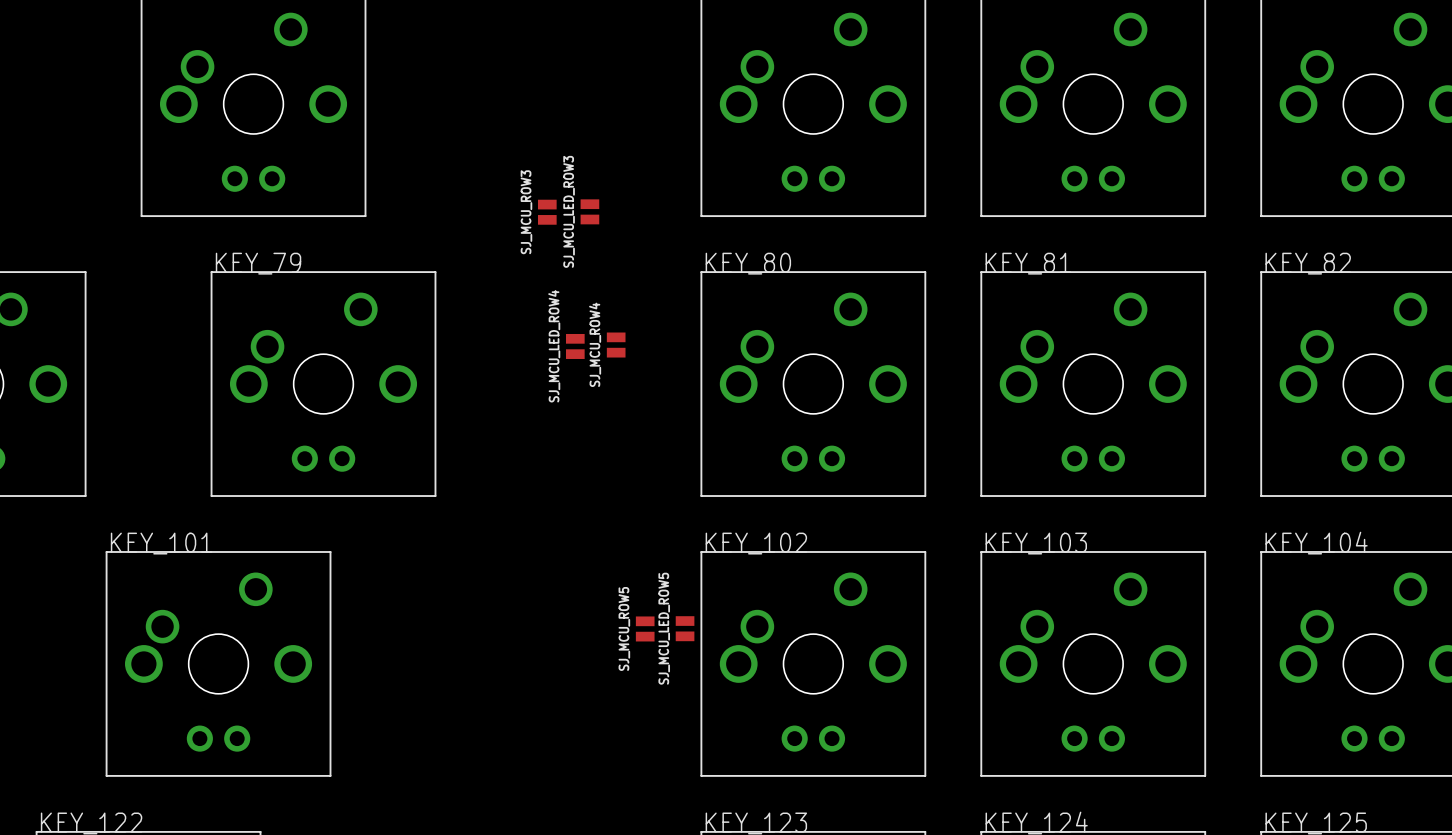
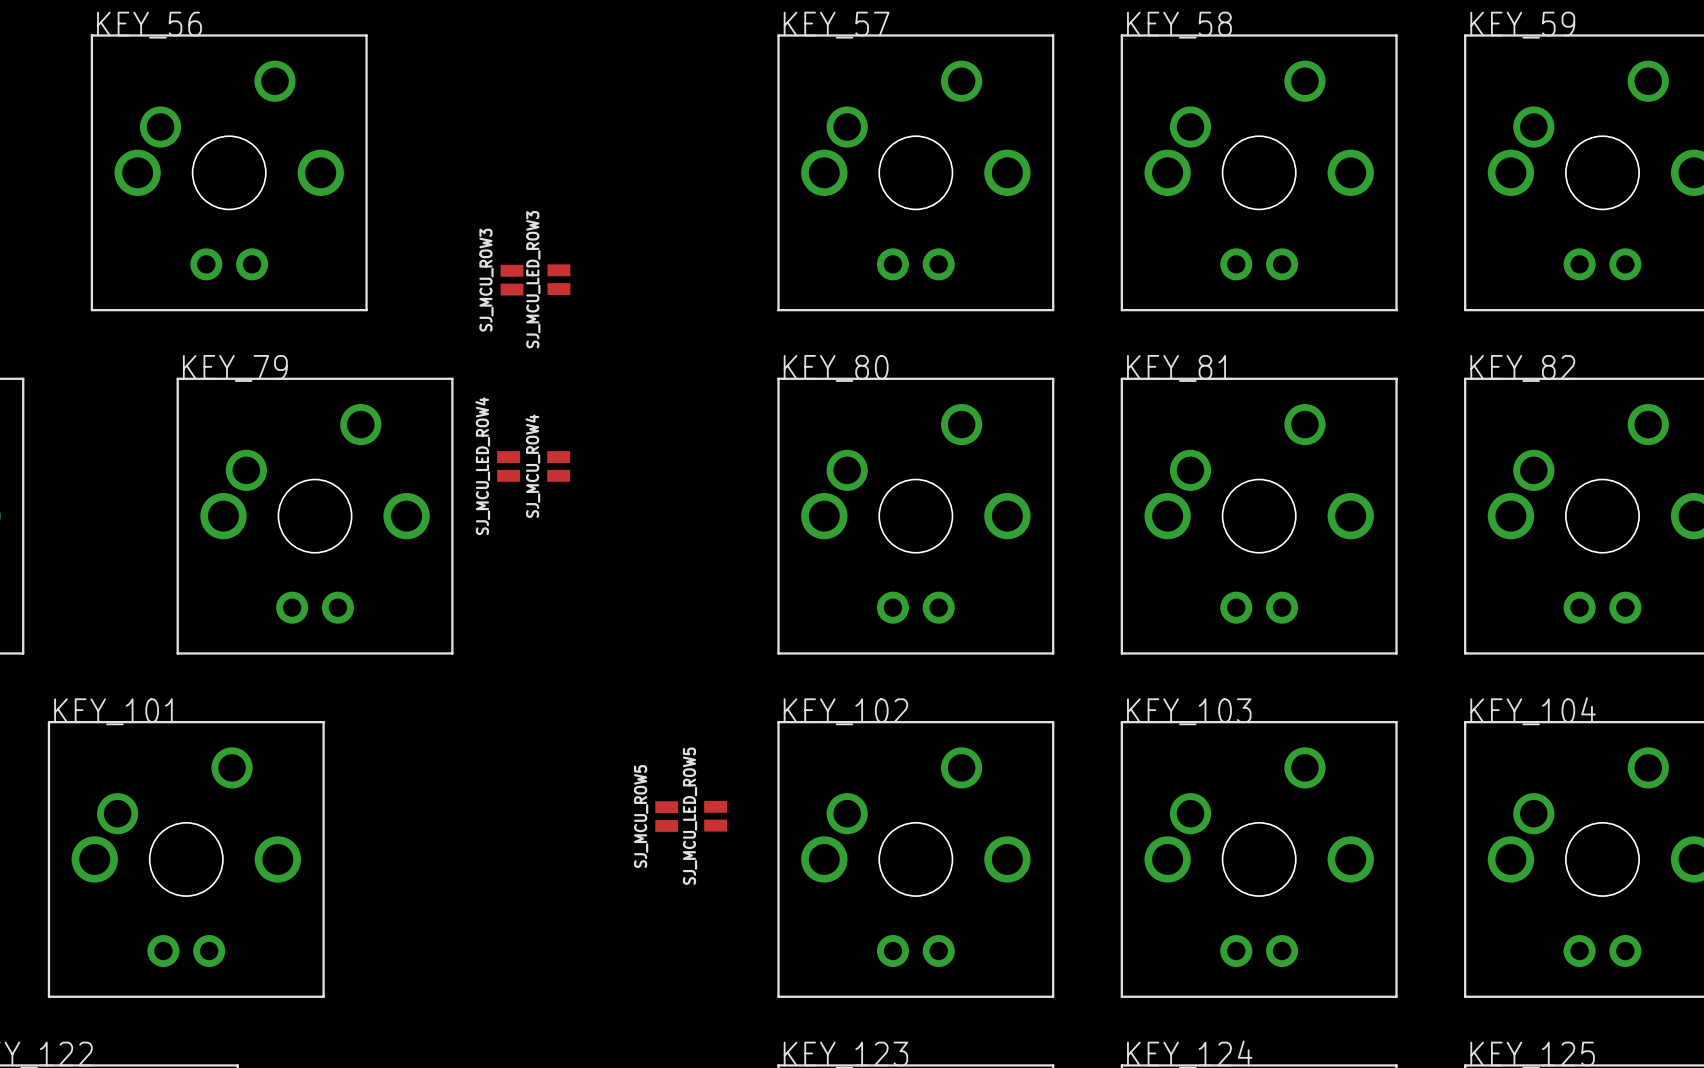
SJ_MCU_LED_ROW3 position: (589, 211) -> (558, 279)
SJ_MCU_ROW3 position: (547, 212) -> (512, 280)
SJ_MCU_ROW4 position: (616, 345) -> (558, 466)
SJ_MCU_LED_ROW4 position: (575, 346) -> (508, 466)
SJ_MCU_ROW5 position: (645, 628) -> (666, 816)
SJ_MCU_LED_ROW5 position: (685, 628) -> (715, 816)

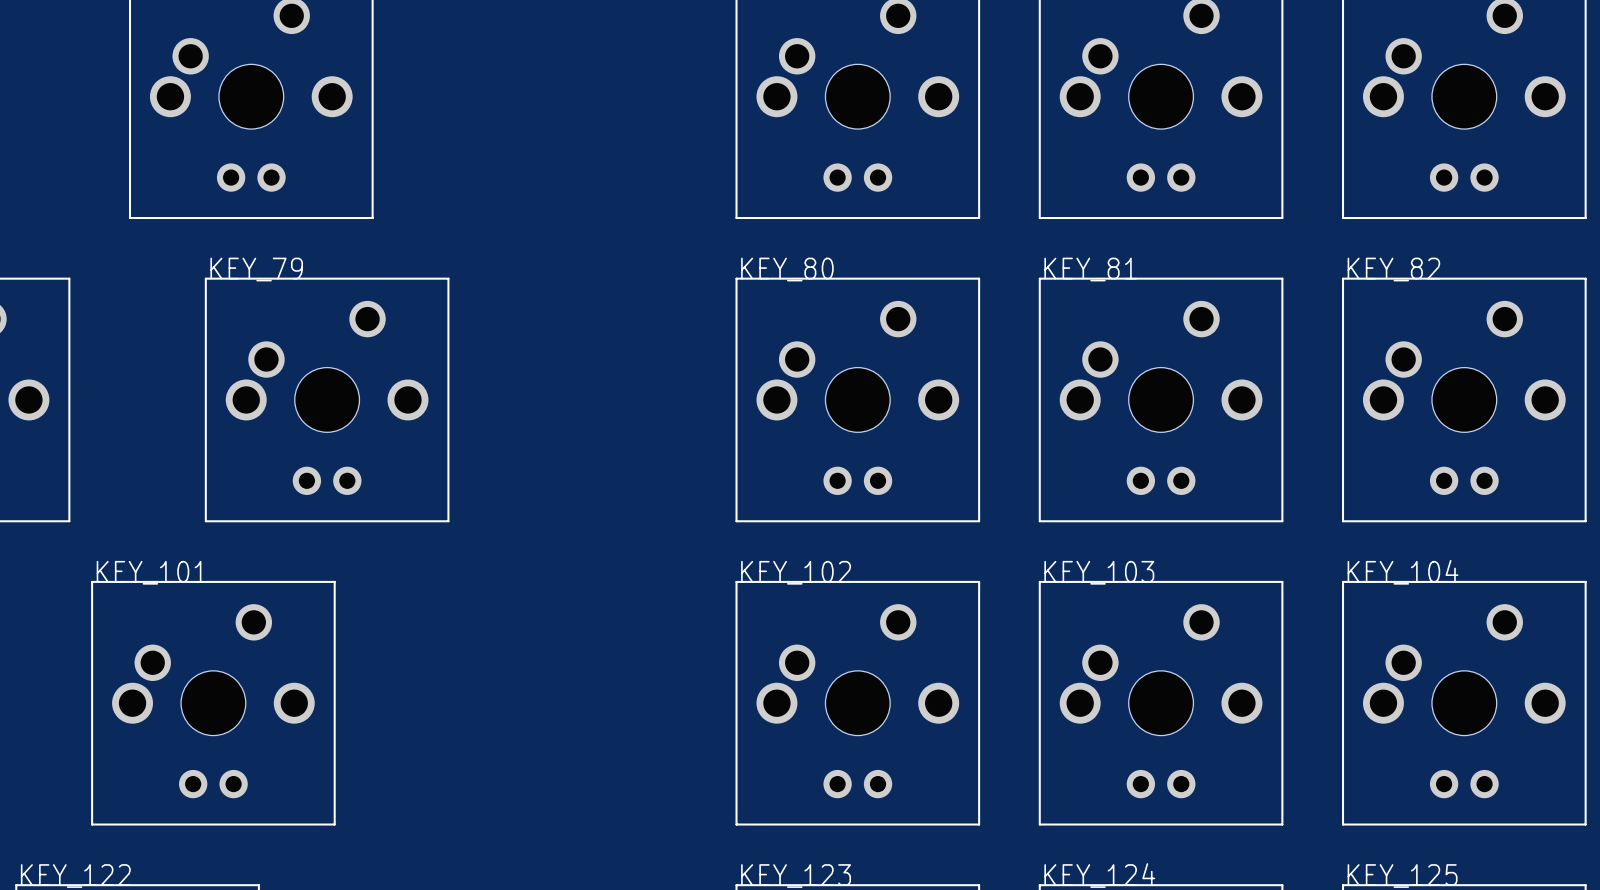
SJ_MCU_LED_ROW3: (558, 279) -> none
SJ_MCU_ROW3: (512, 280) -> none
SJ_MCU_LED_ROW4: (508, 466) -> none
SJ_MCU_ROW4: (558, 466) -> none
SJ_MCU_ROW5: (666, 816) -> none
SJ_MCU_LED_ROW5: (715, 816) -> none

